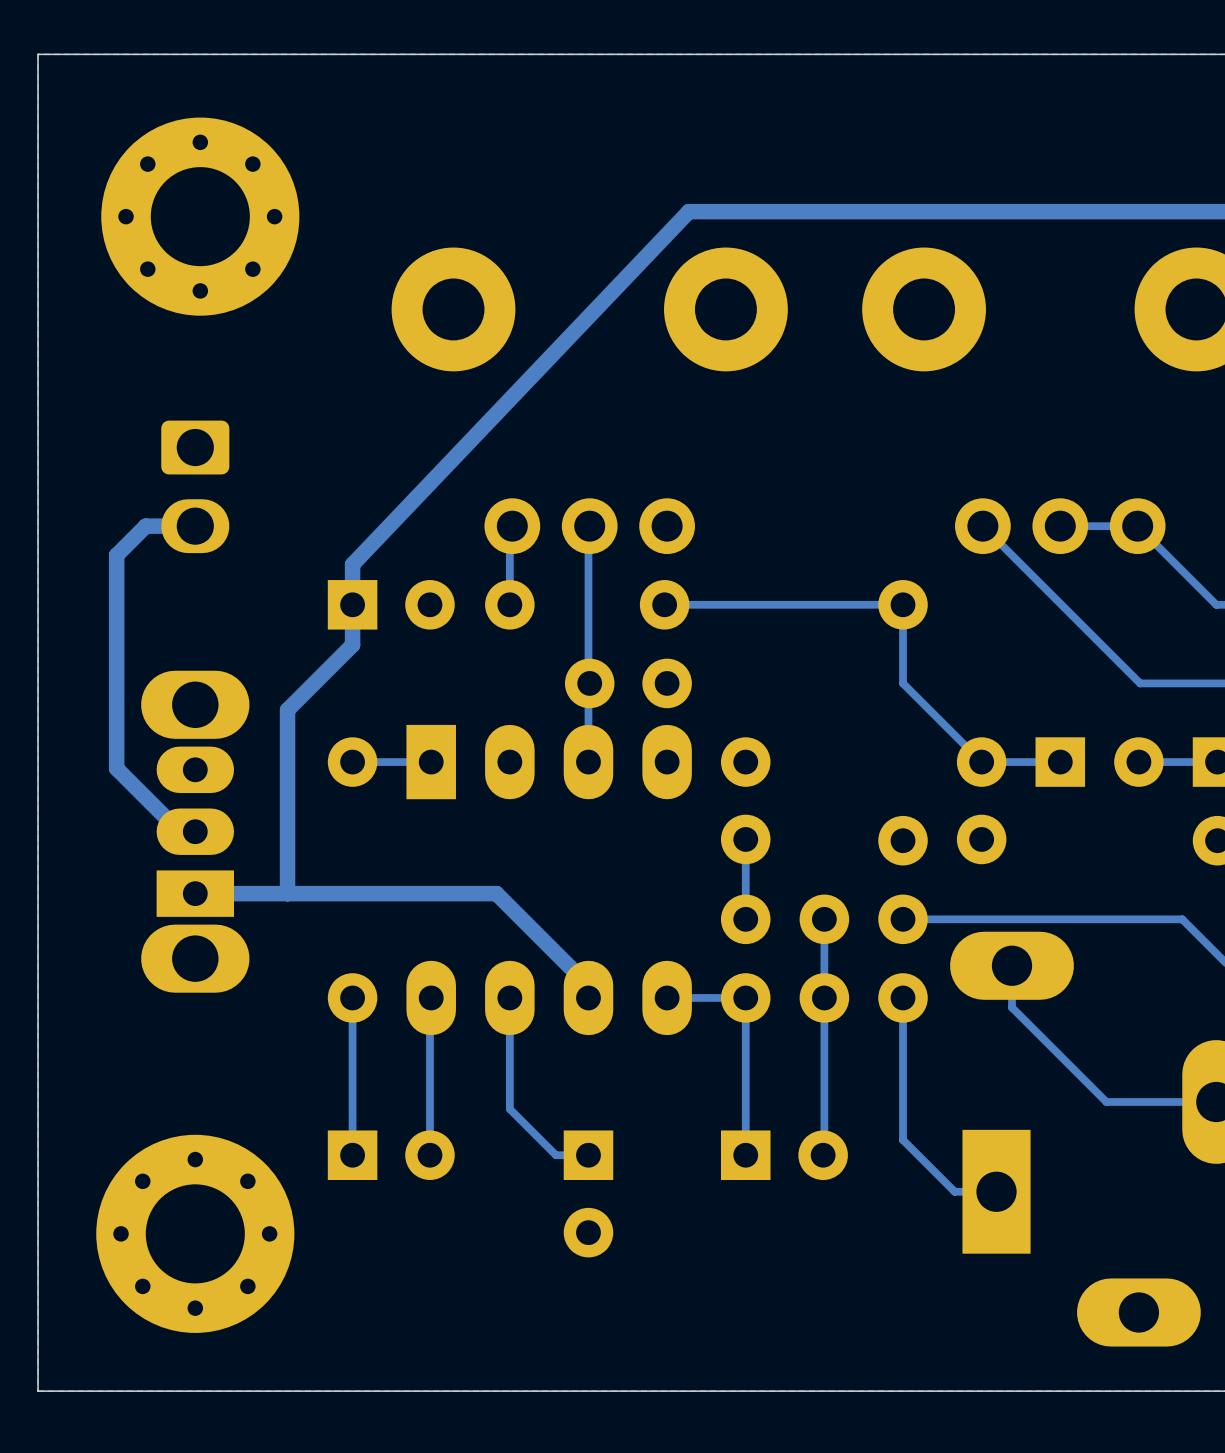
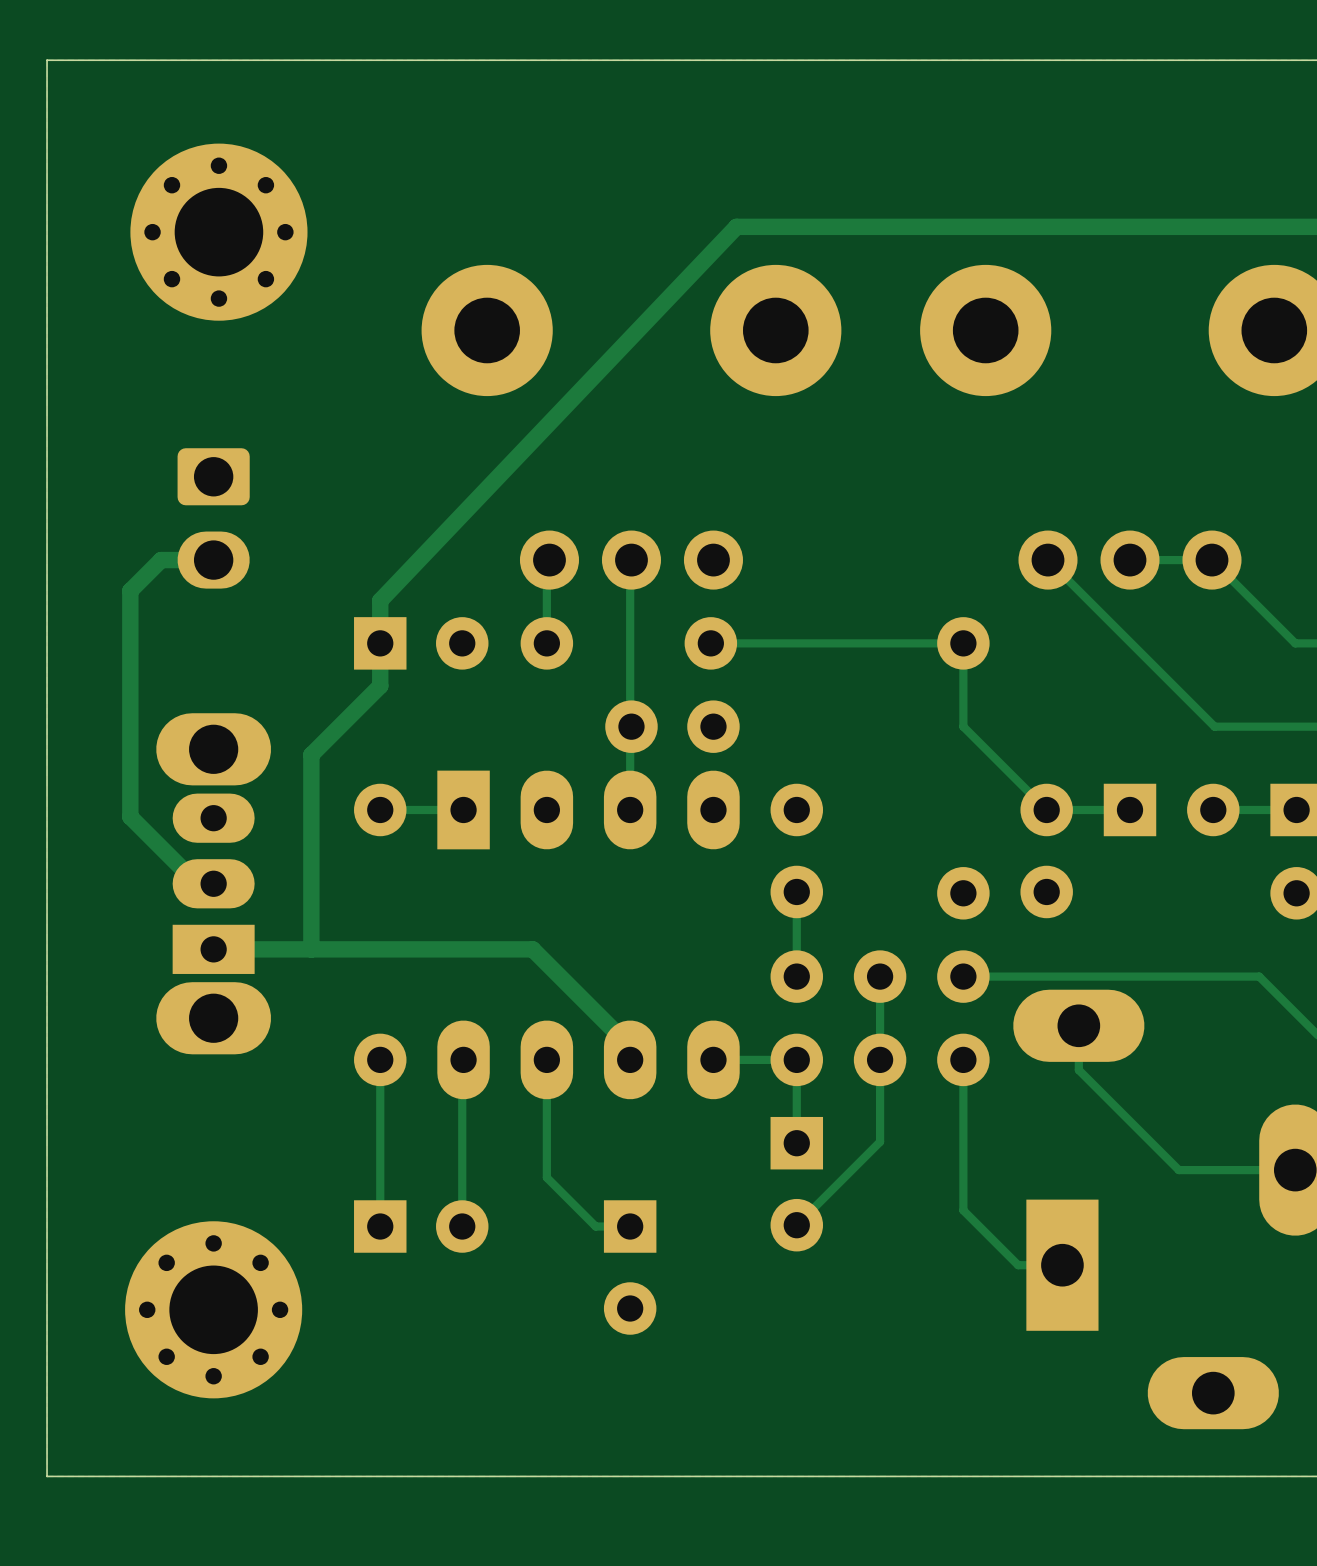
part footprint: [101, 117, 300, 316] -> [130, 143, 308, 321]
track: (824, 1075) (823, 1155) -> (880, 1141) (796, 1225)
track: (745, 1076) (745, 1155) -> none
part footprint: [96, 1134, 295, 1333] -> [125, 1221, 303, 1399]
part rotation: 0° (784, 1155) -> 90° clockwise (796, 1184)

